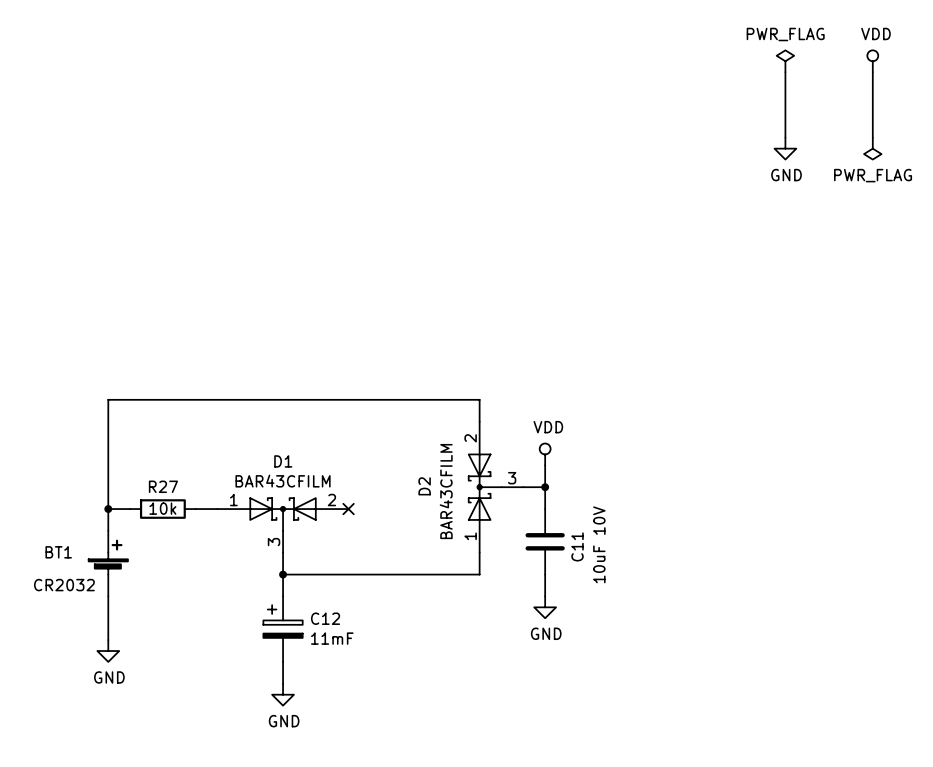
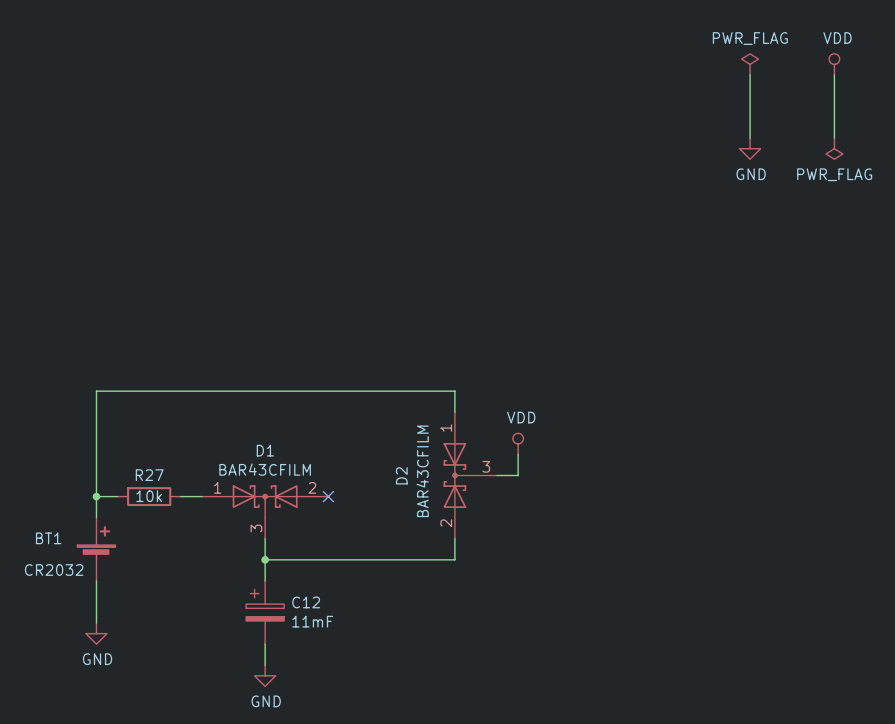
D2 flip: as is (484, 487) -> up-down (459, 475)
wire: (545, 487) (545, 509) -> none
junction: (545, 487) -> none
C11: 10uF 10V (545, 541) -> none
wire: (545, 574) (545, 596) -> none
power symbol: GND (545, 607) -> none

